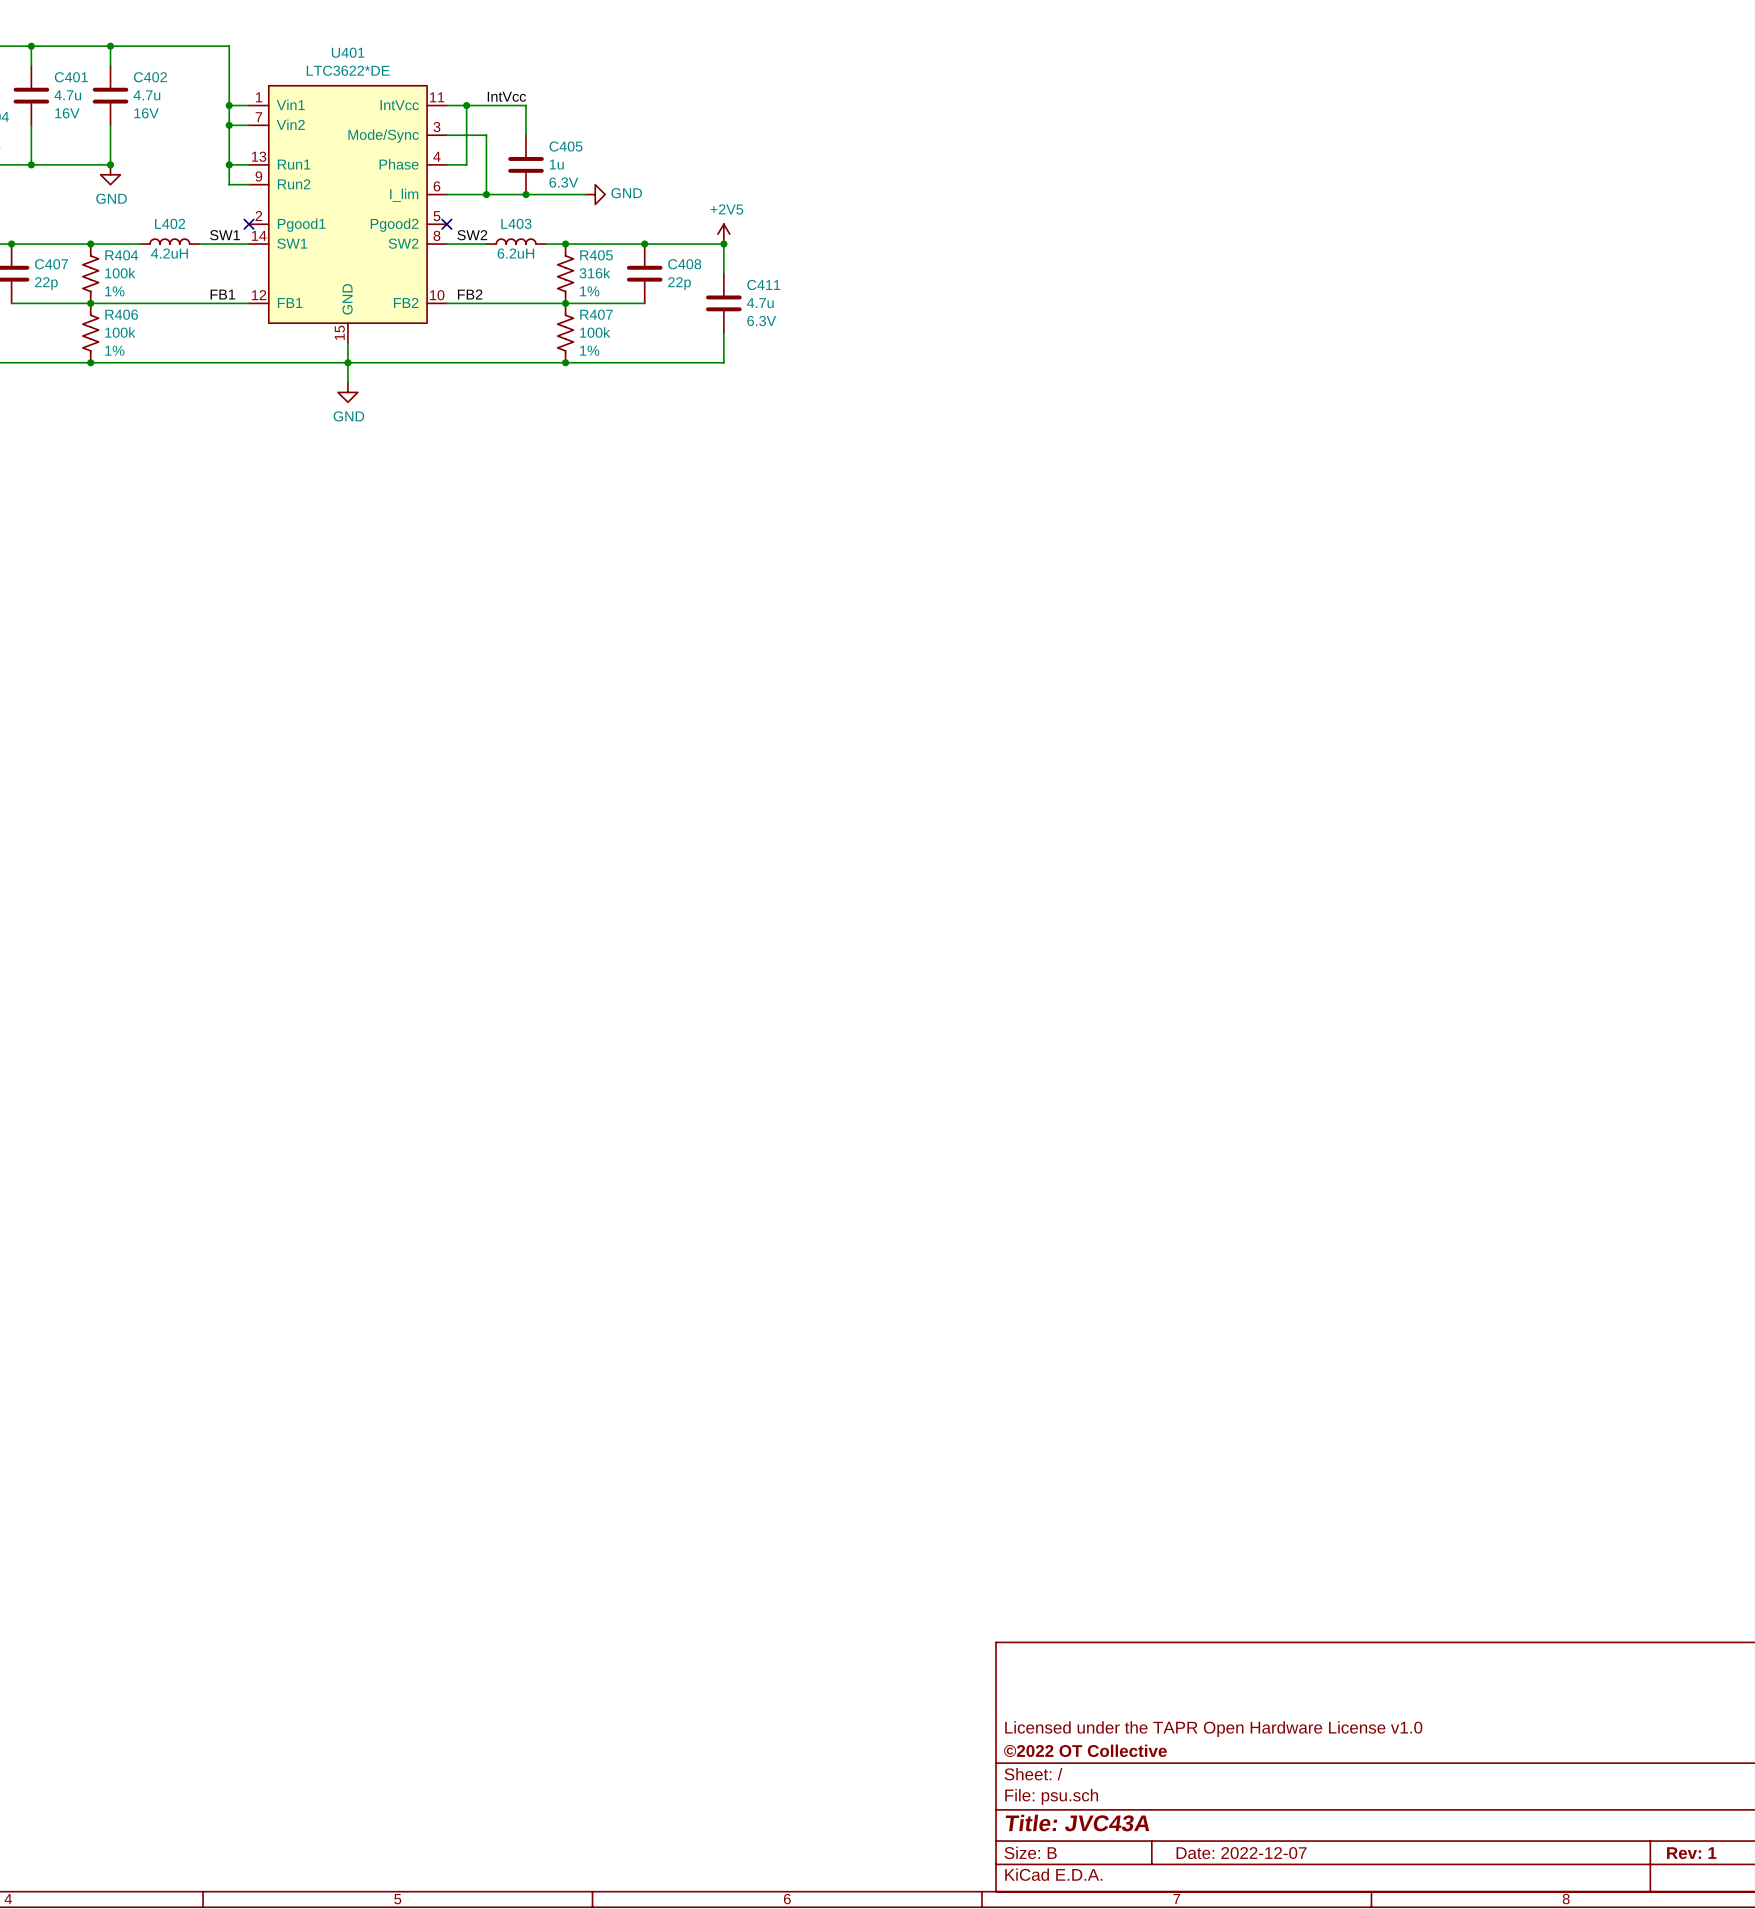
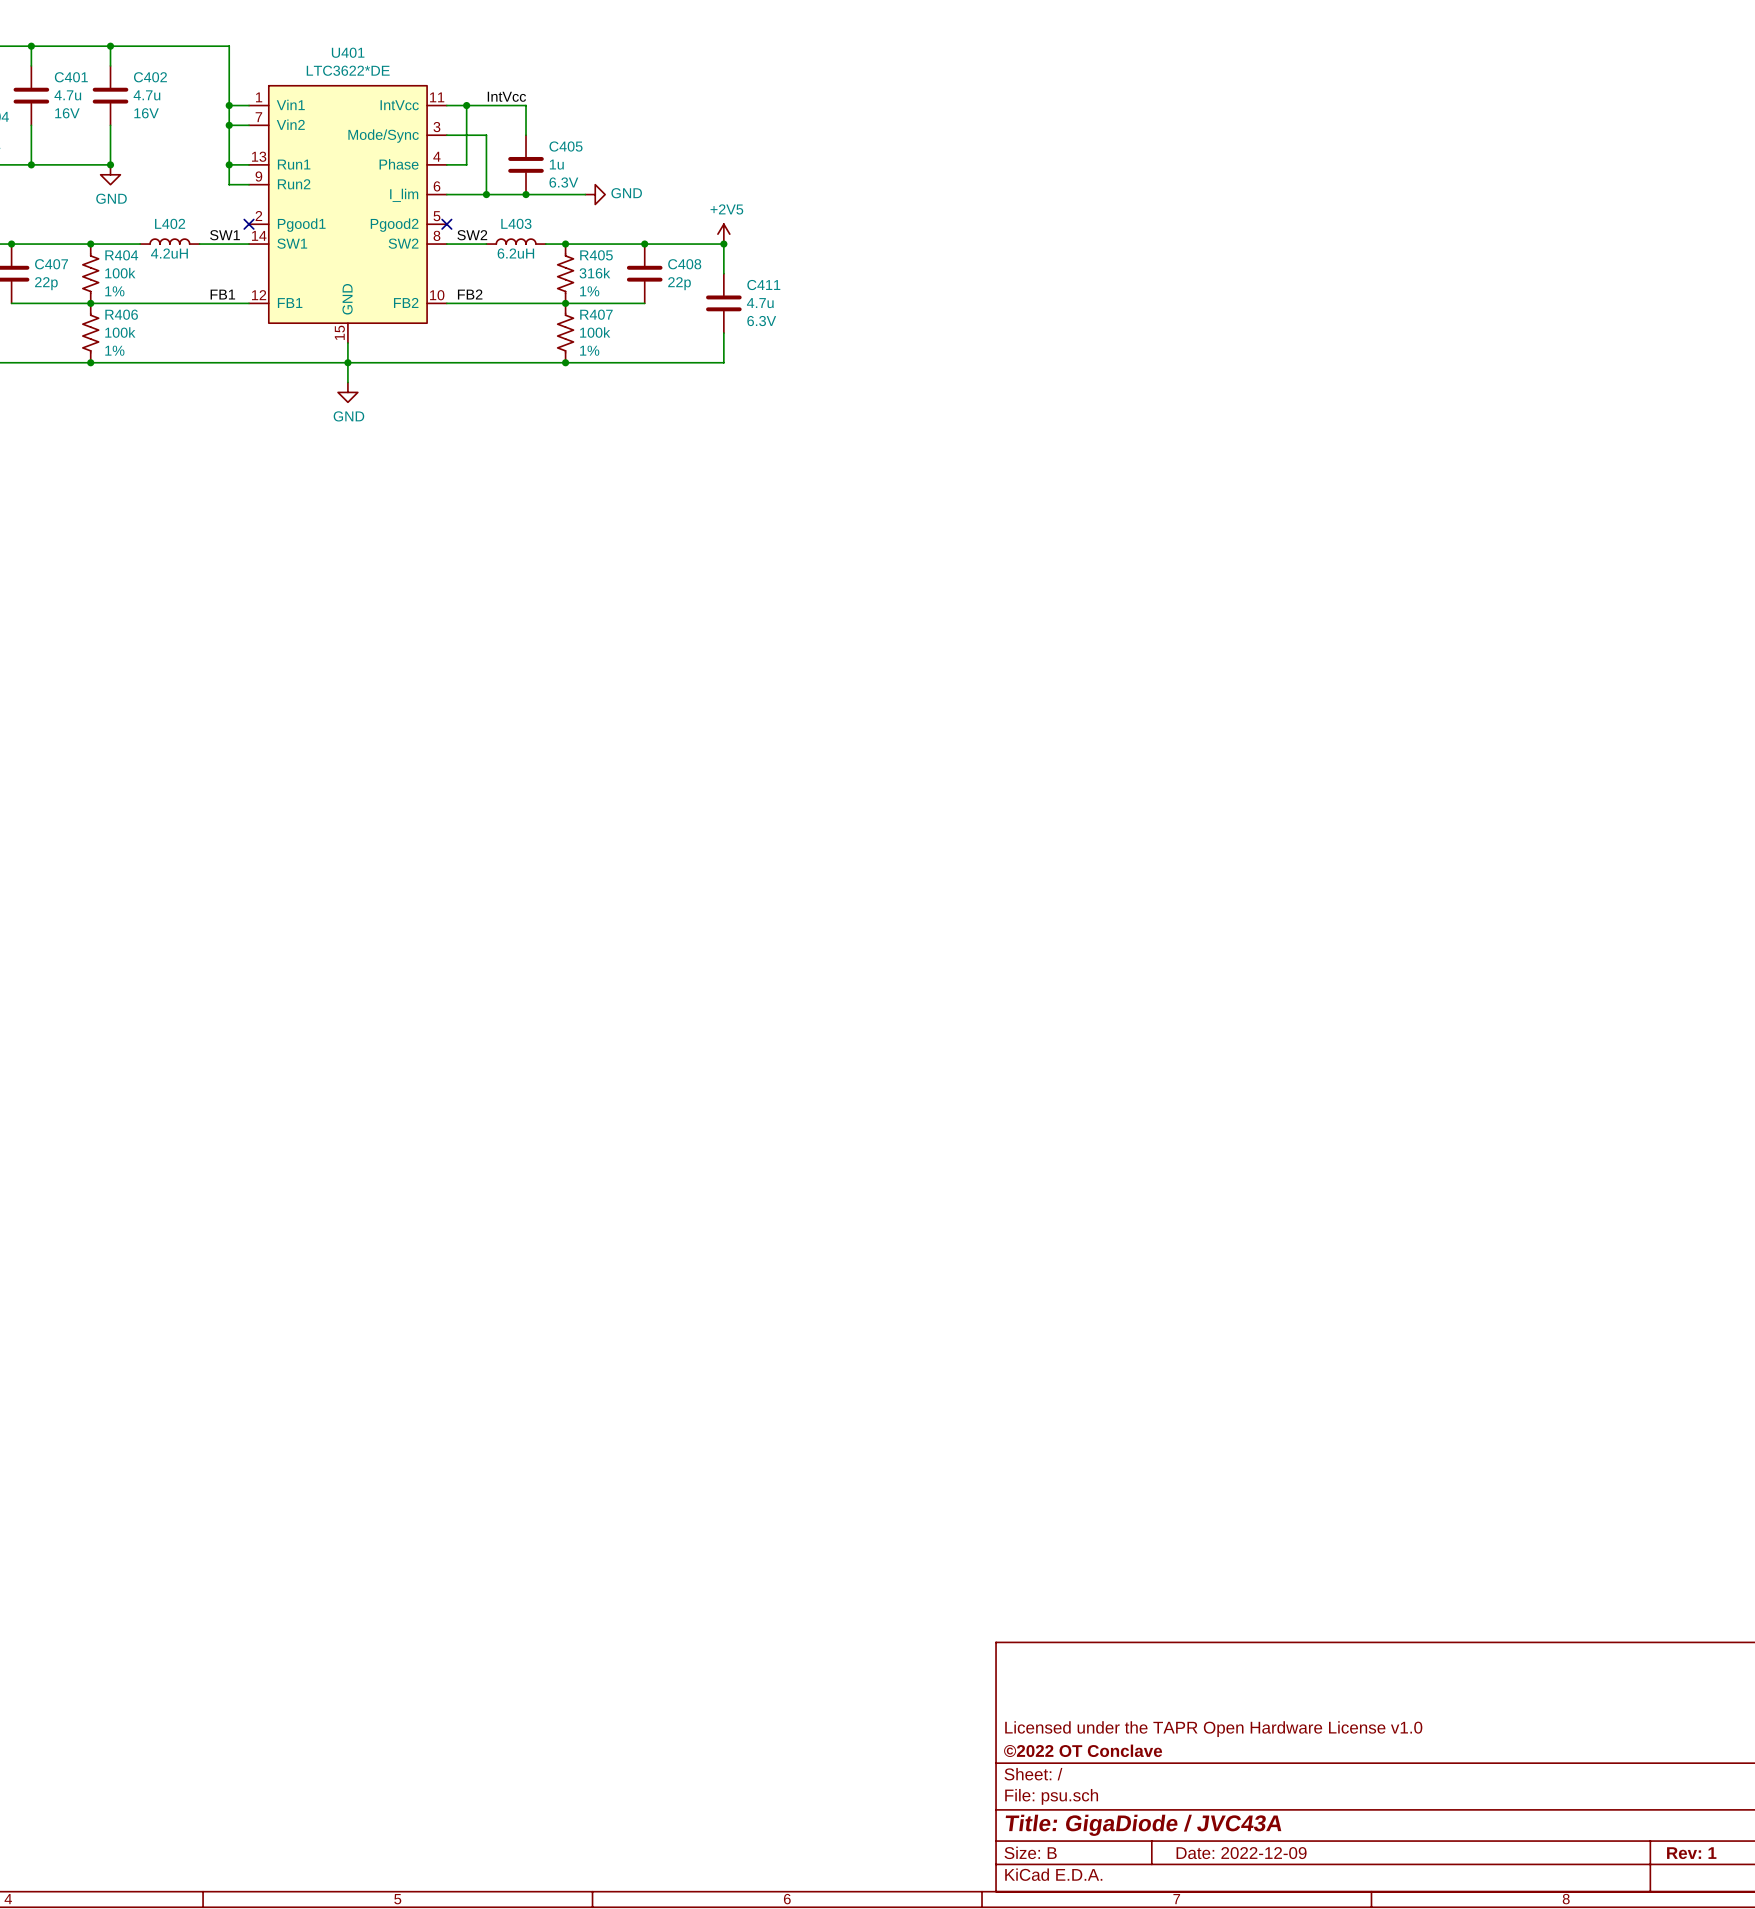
title block: ©2022 OT Collective (1085, 1750) -> ©2022 OT Conclave (1083, 1750)
title block: Title: JVC43A (1077, 1823) -> Title: GigaDiode / JVC43A (1143, 1825)
title block: Date: 2022-12-07 (1241, 1853) -> Date: 2022-12-09 (1241, 1853)

